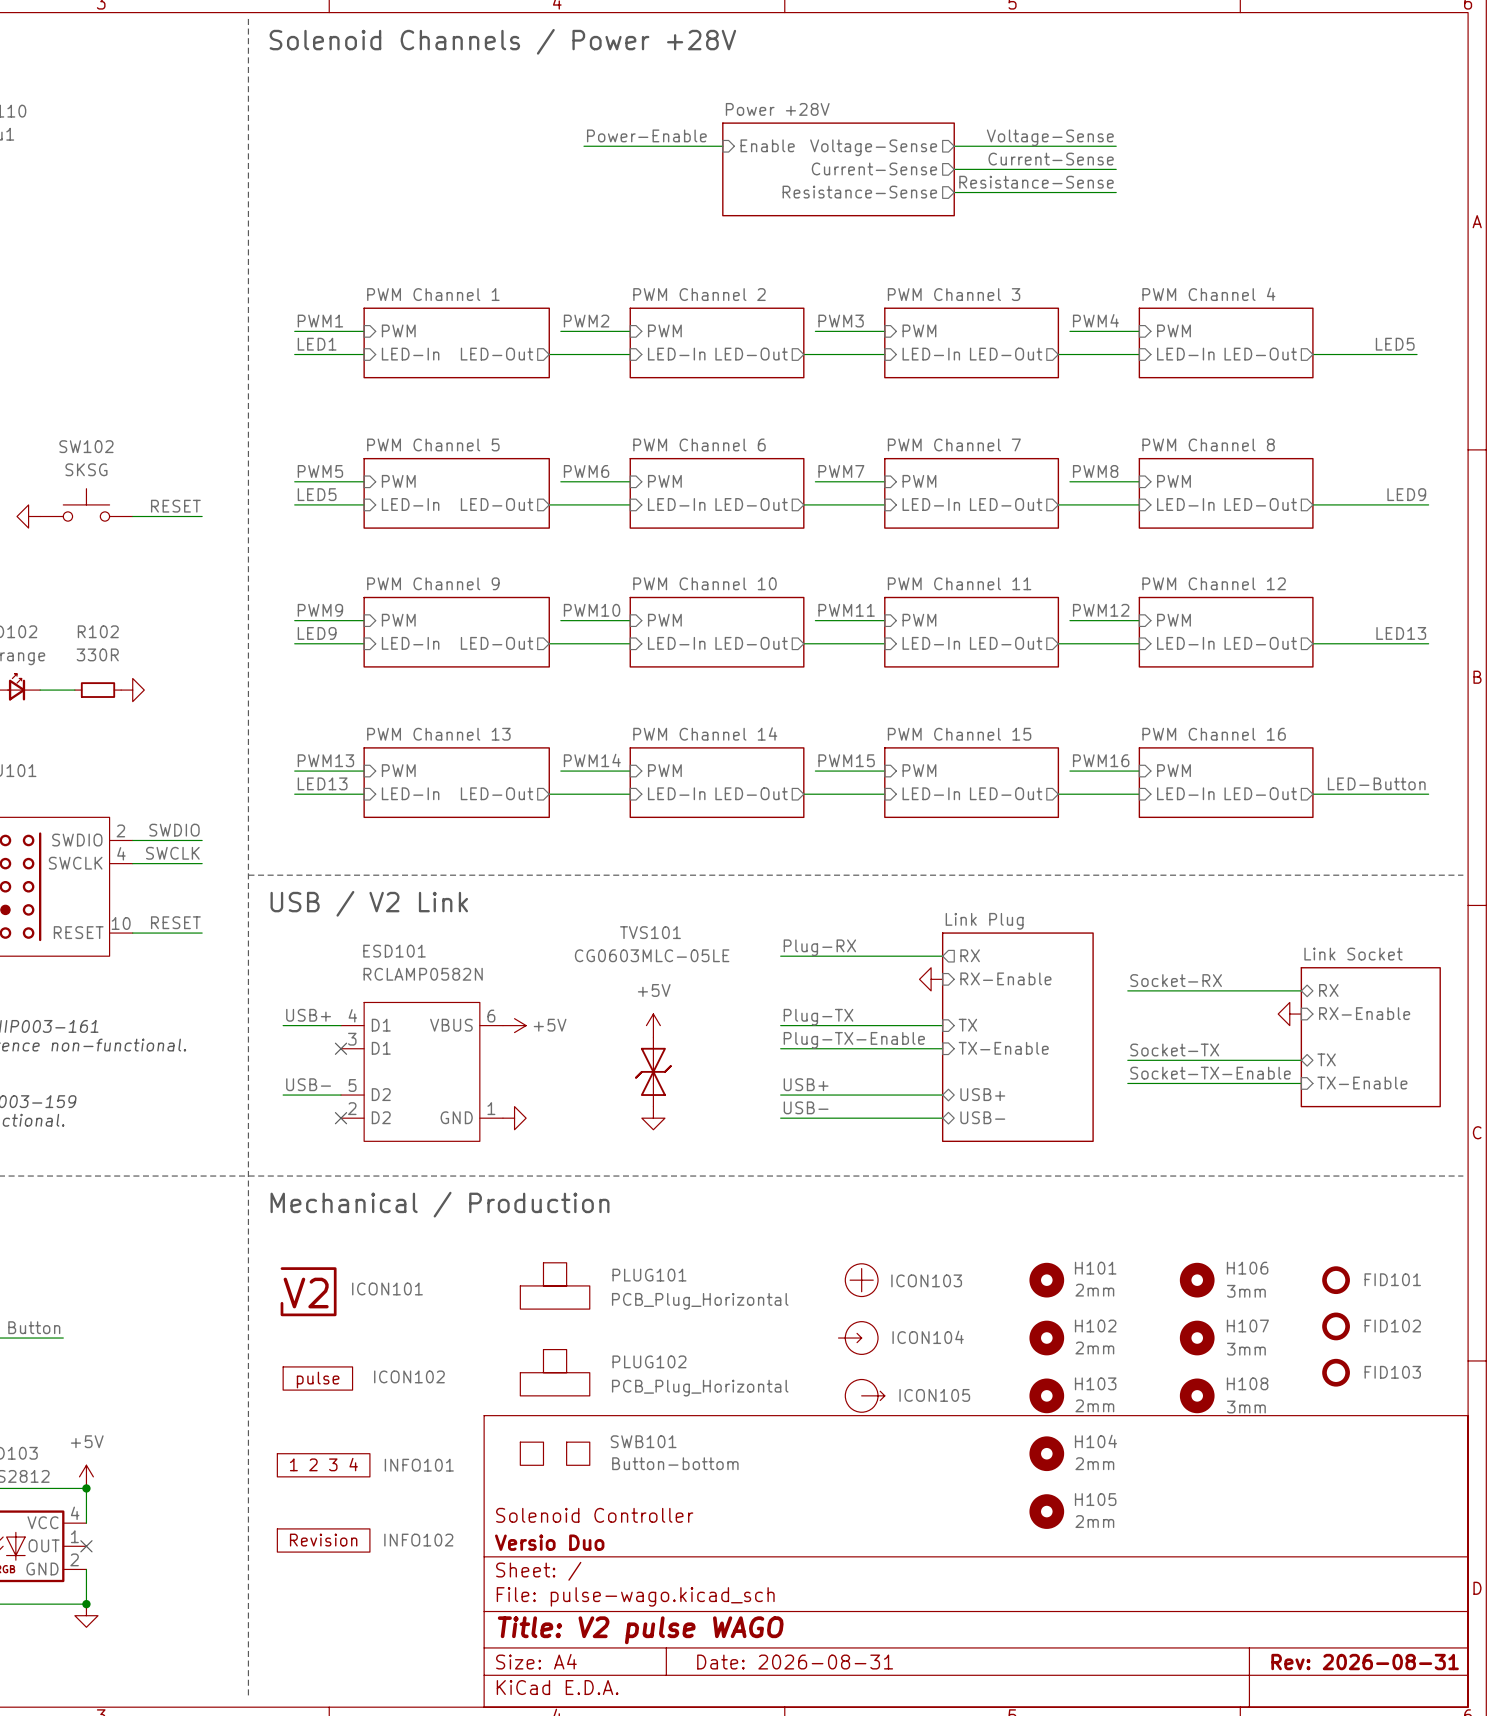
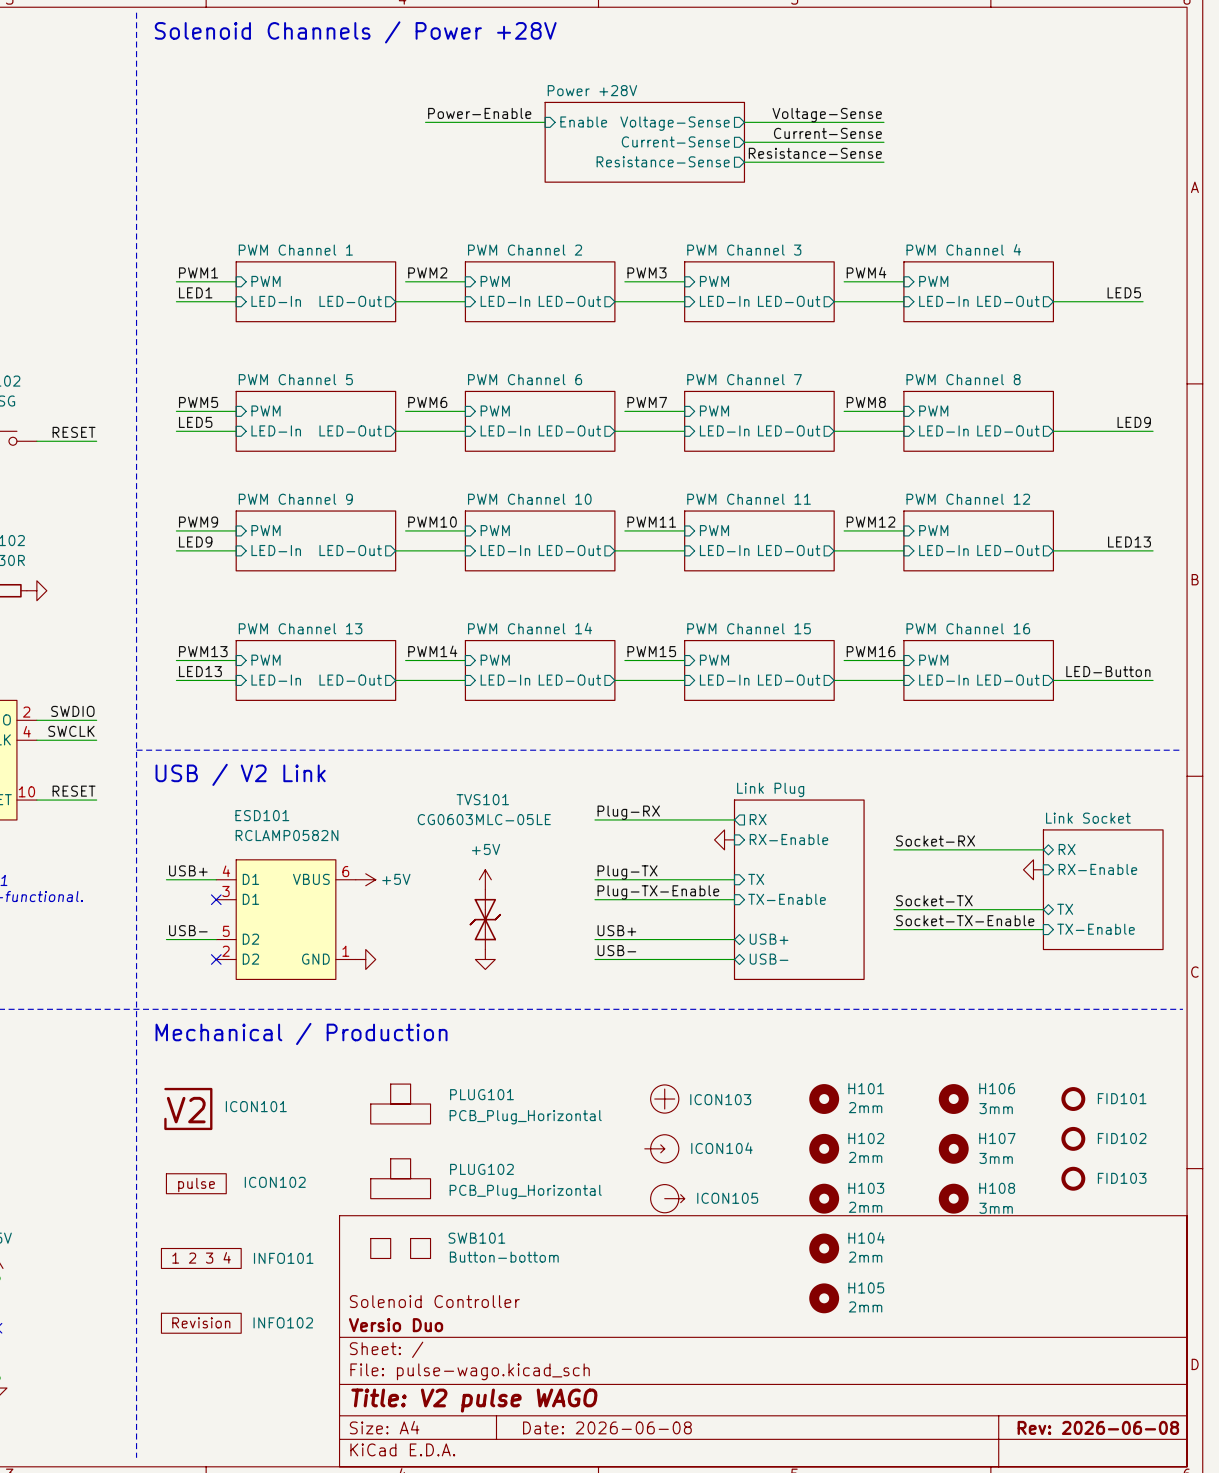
title block: Date: 2026-08-31 (795, 1662) -> Date: 2026-06-08 (607, 1427)
title block: Rev: 2026-08-31 (1365, 1662) -> Rev: 2026-06-08 (1098, 1427)

